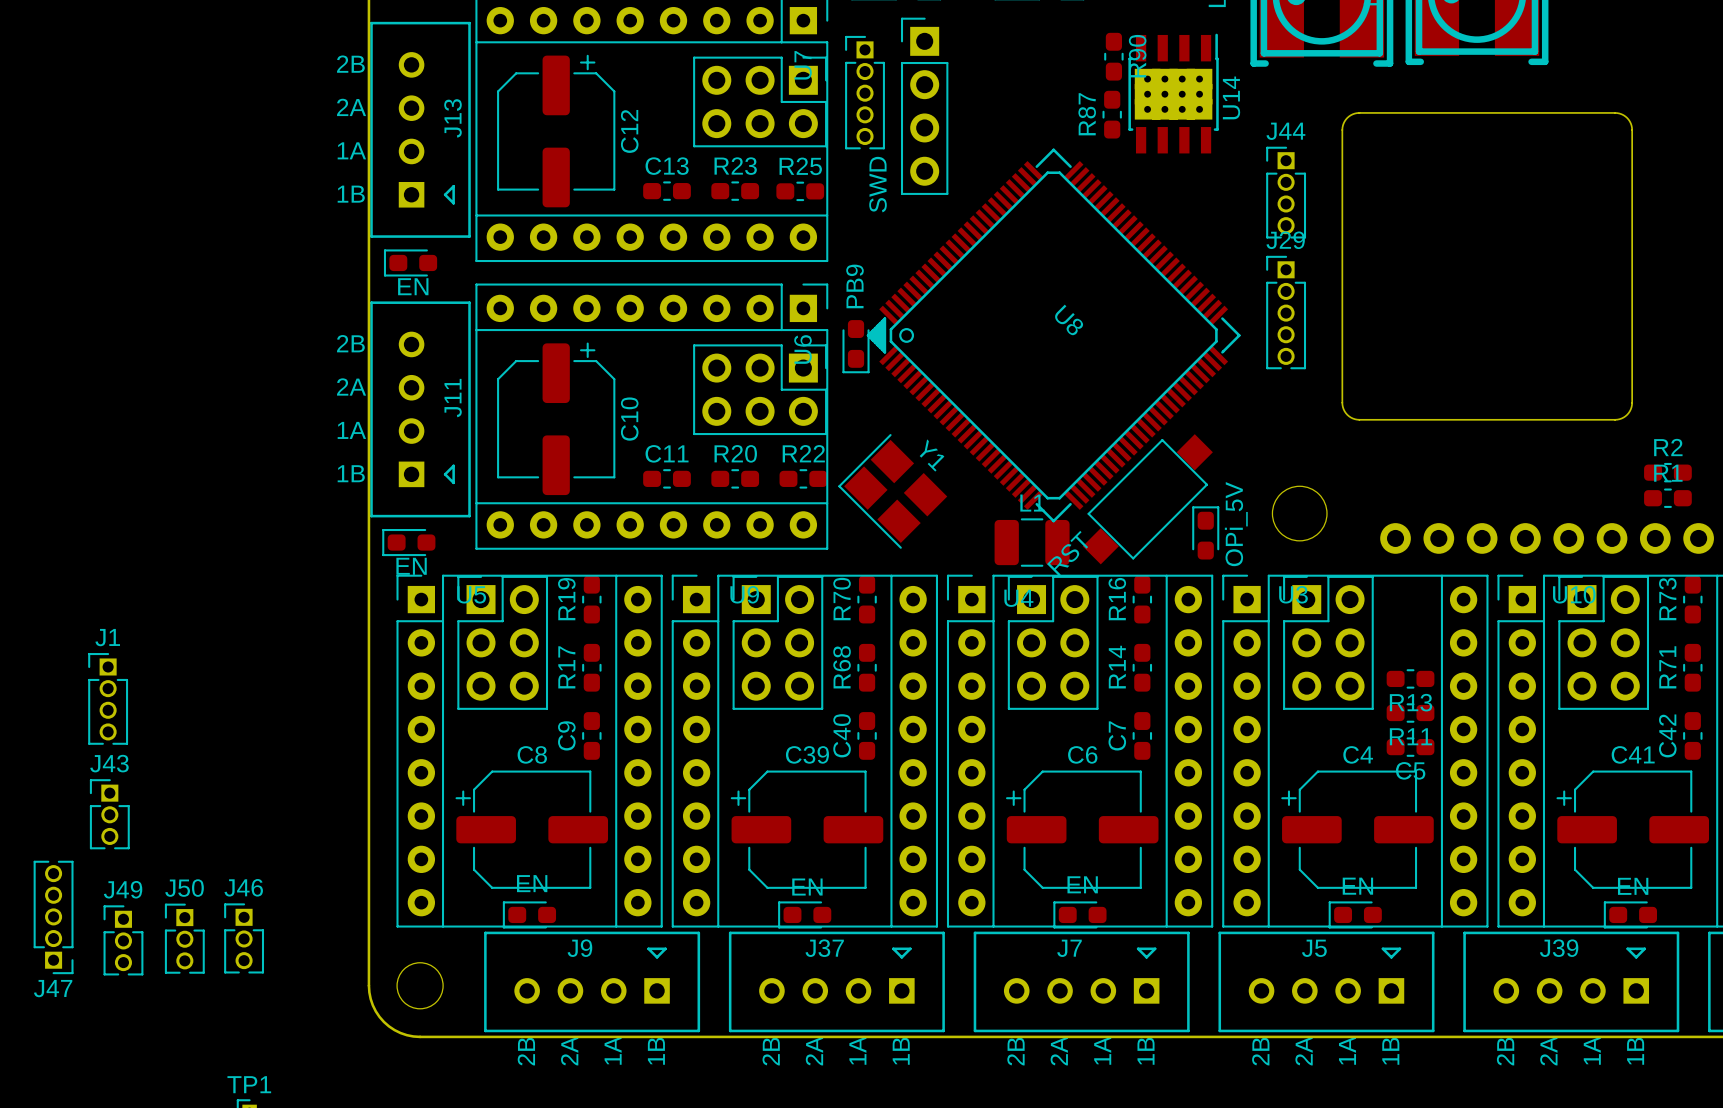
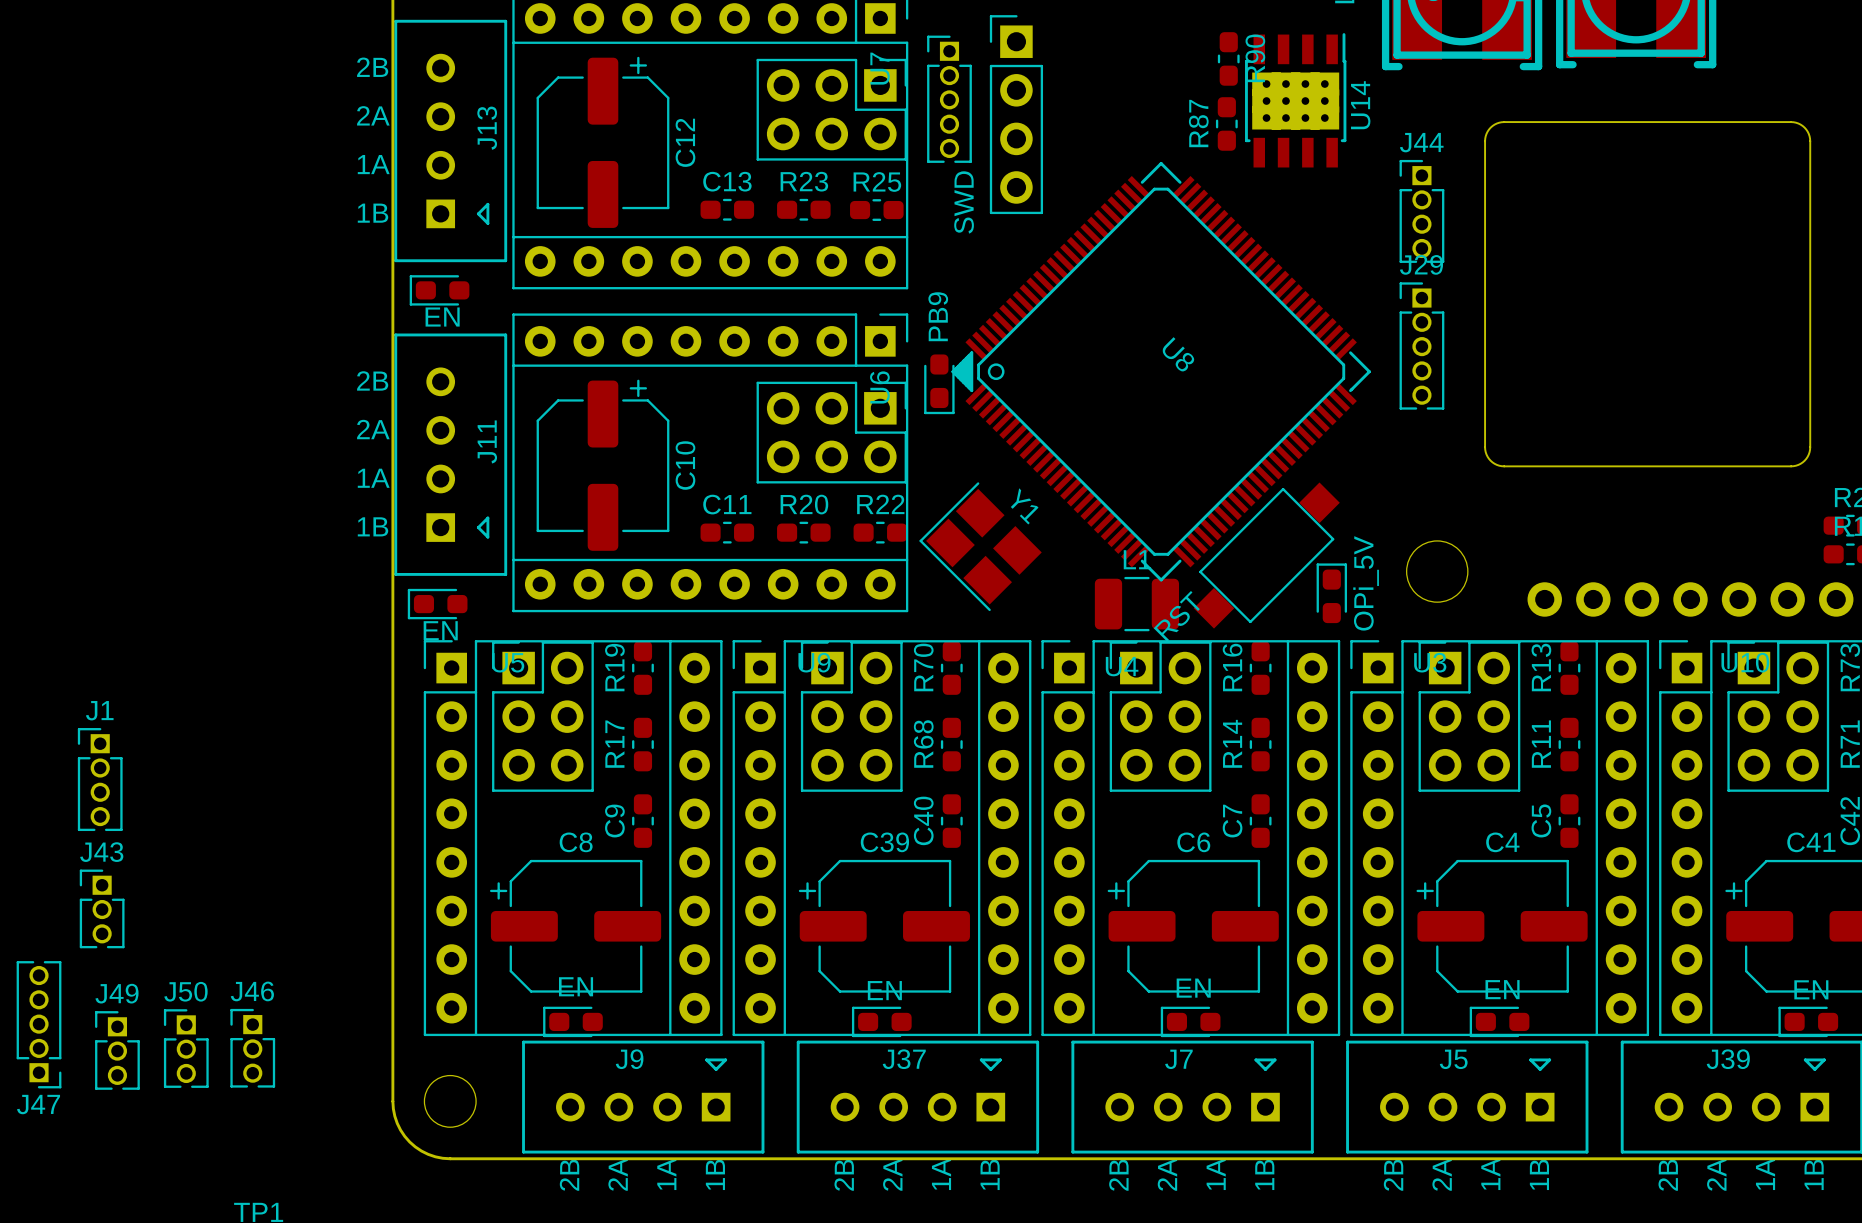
R13 rotation: 0° (1410, 678) -> 90° clockwise (1569, 668)
R13 position: (1410, 678) -> (1569, 668)
R11 rotation: 0° (1410, 713) -> 90° clockwise (1569, 744)
R11 position: (1410, 713) -> (1569, 744)
C5 rotation: 0° (1410, 747) -> 90° clockwise (1569, 821)

